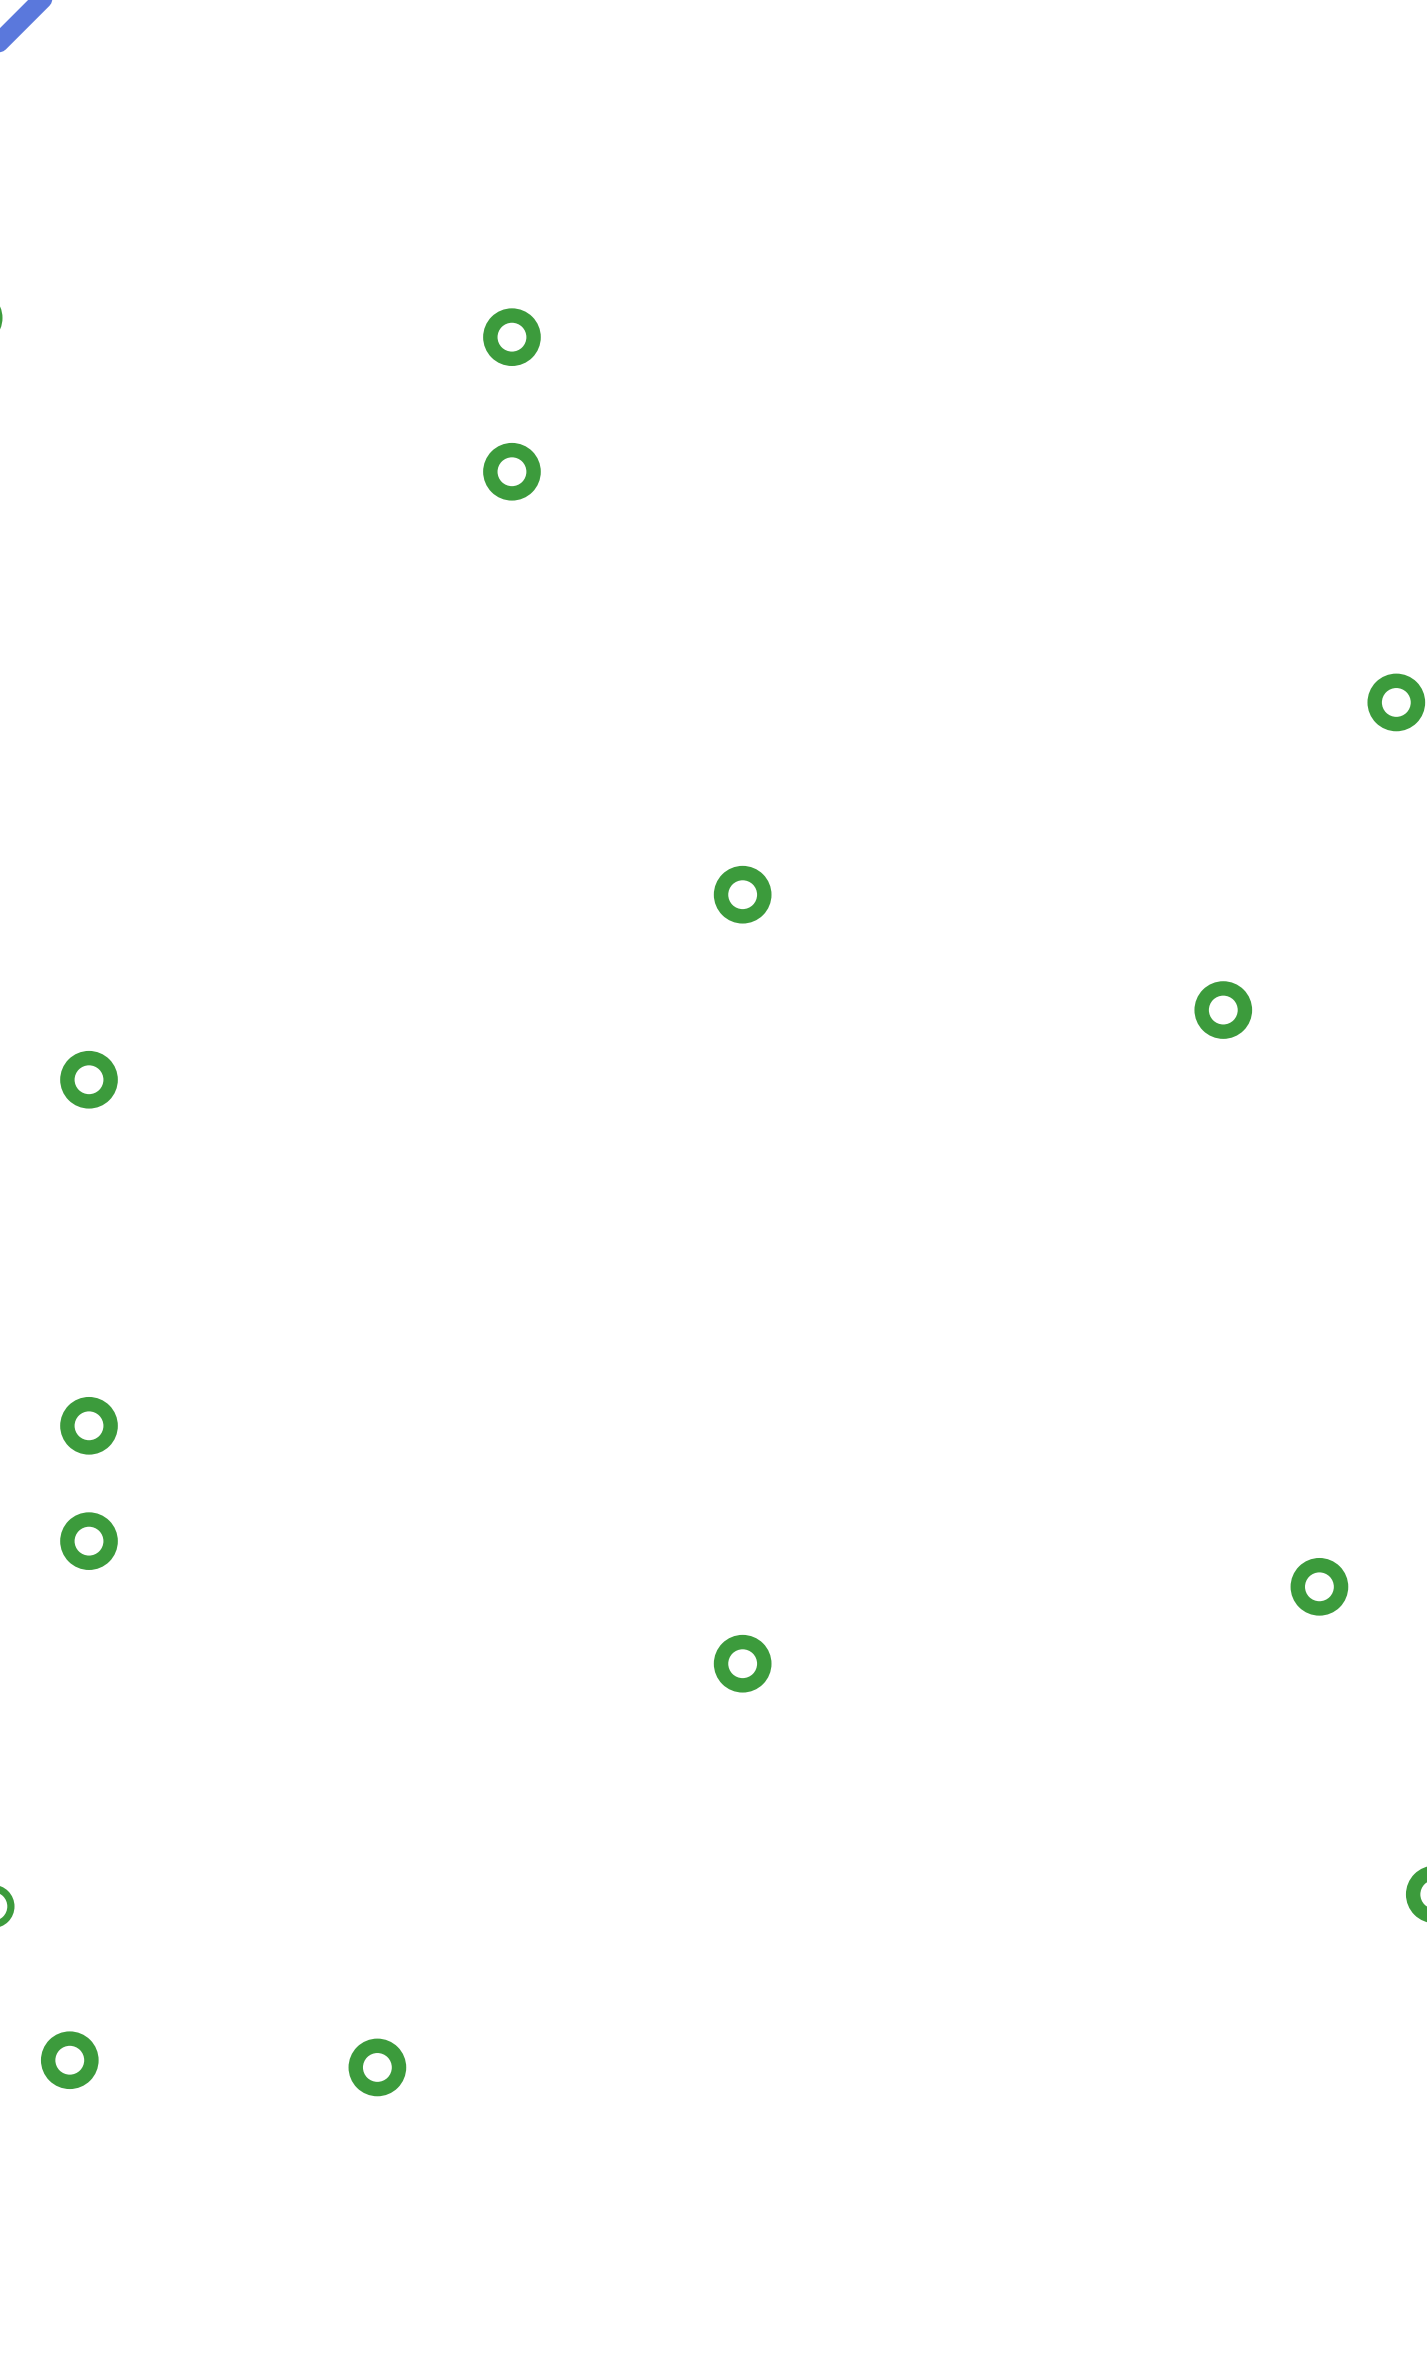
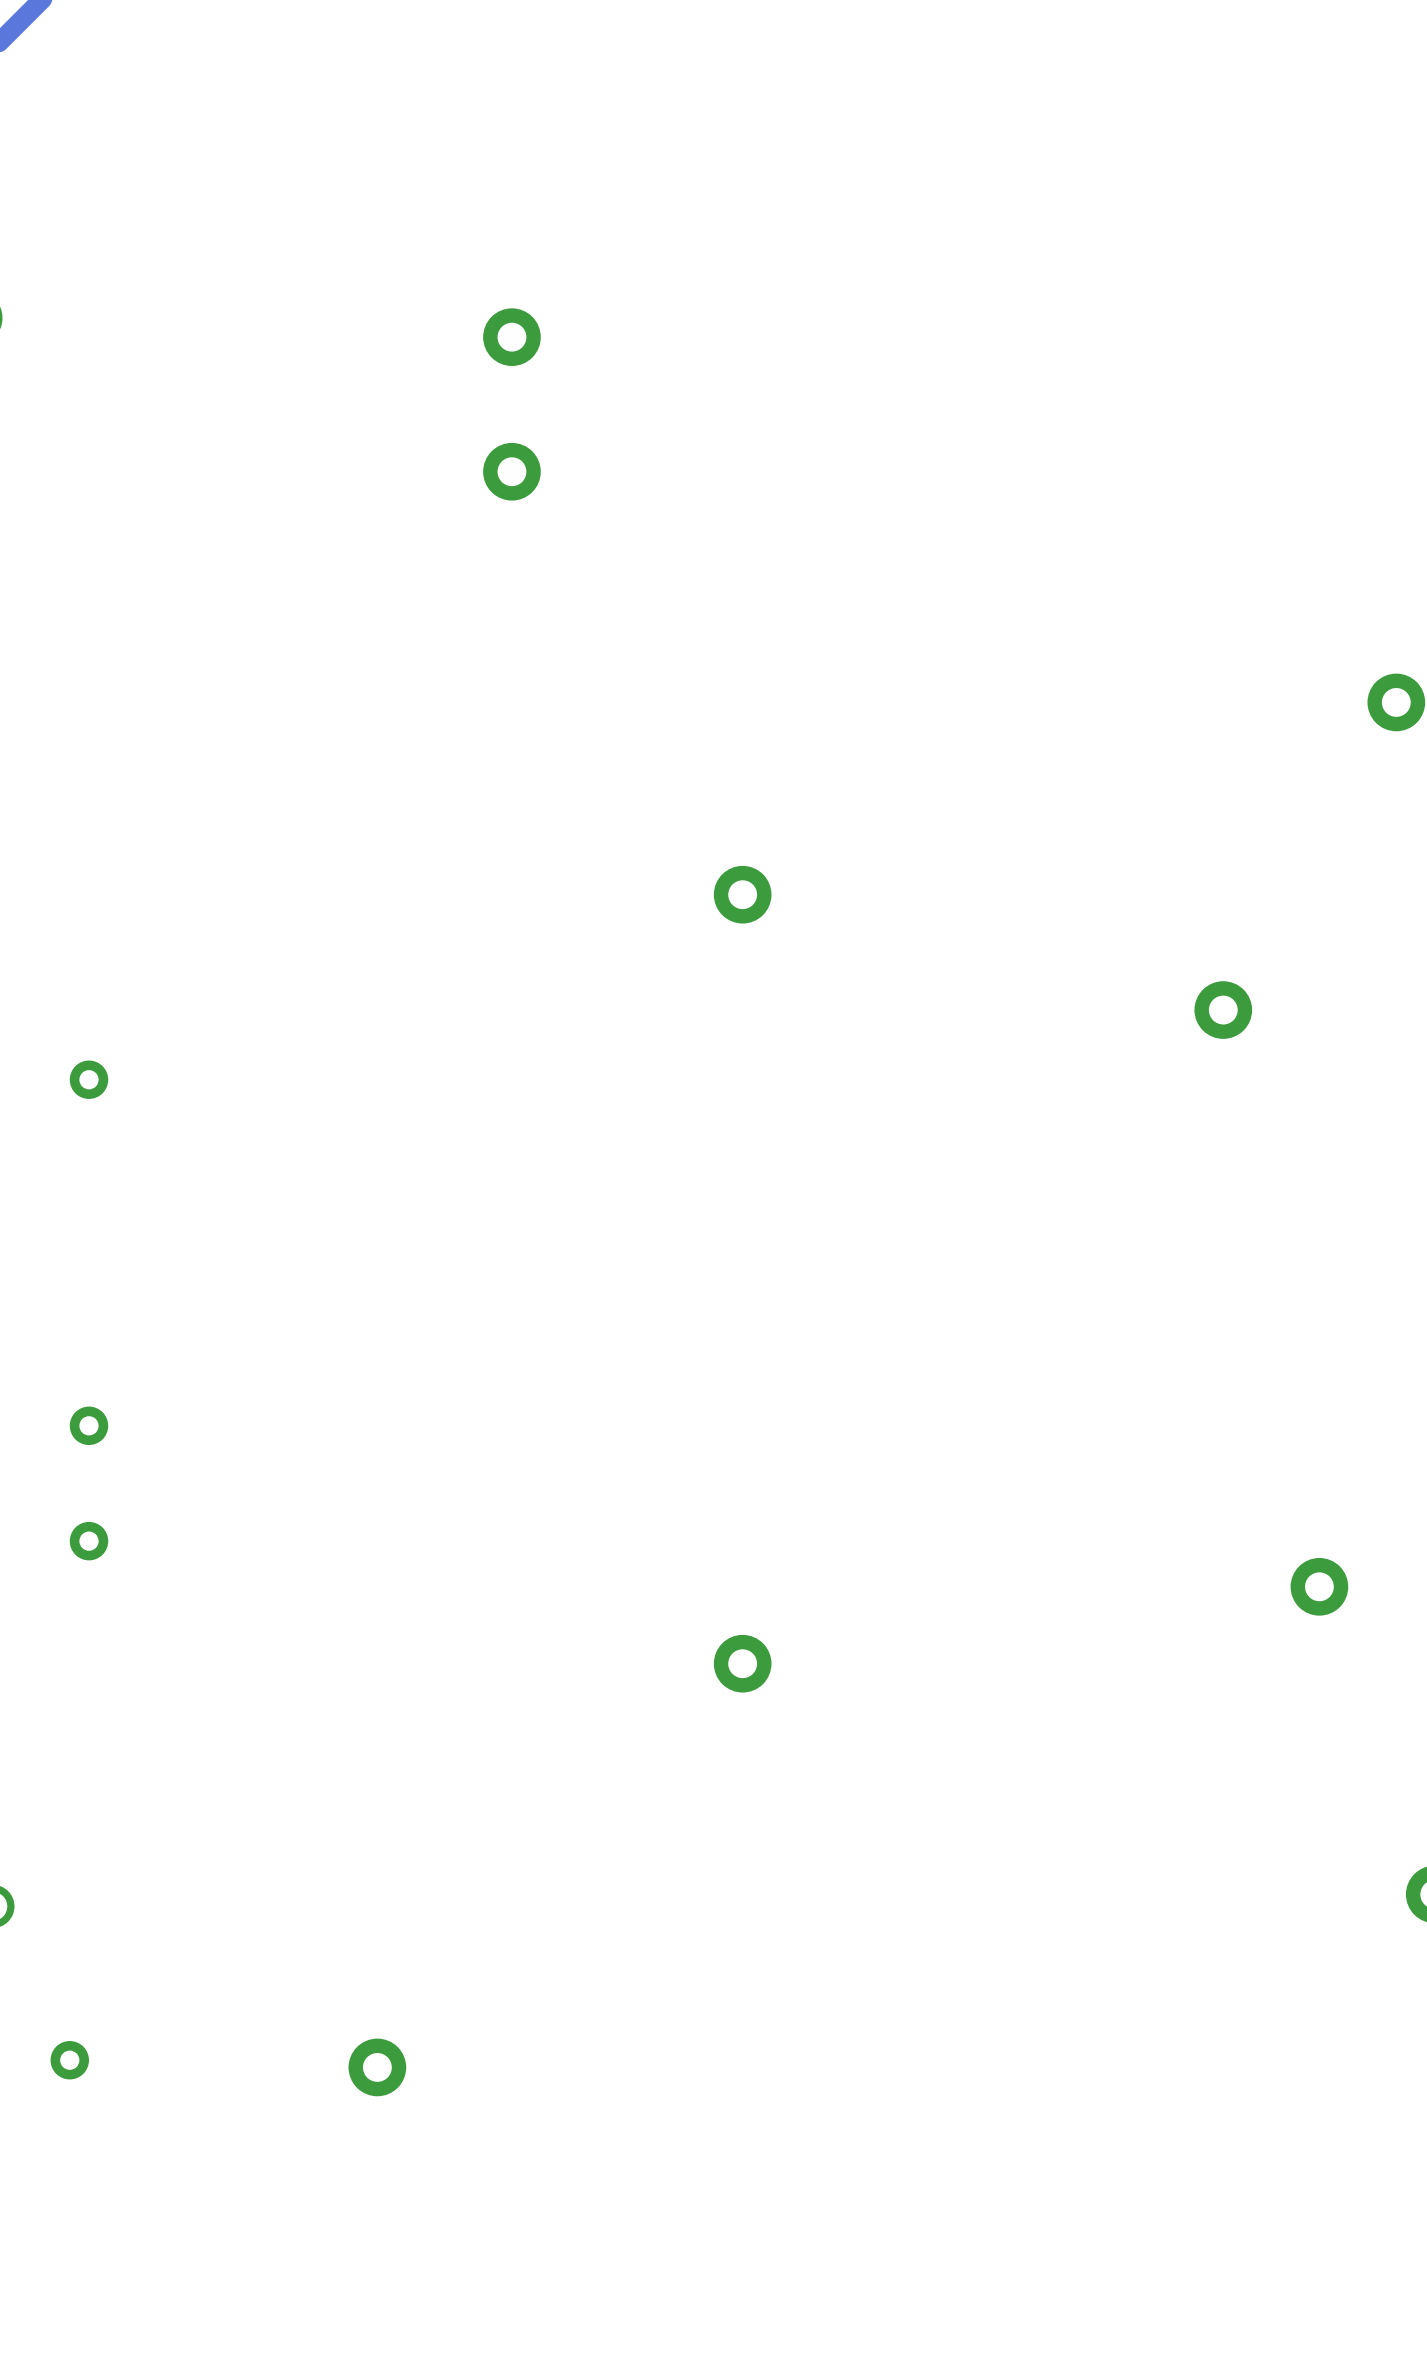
via size: [60, 1050, 118, 1109] -> [69, 1060, 109, 1099]
via size: [60, 1396, 118, 1455] -> [69, 1406, 109, 1446]
via size: [60, 1512, 118, 1570] -> [69, 1521, 109, 1561]
via size: [40, 2031, 99, 2090] -> [50, 2041, 90, 2080]

